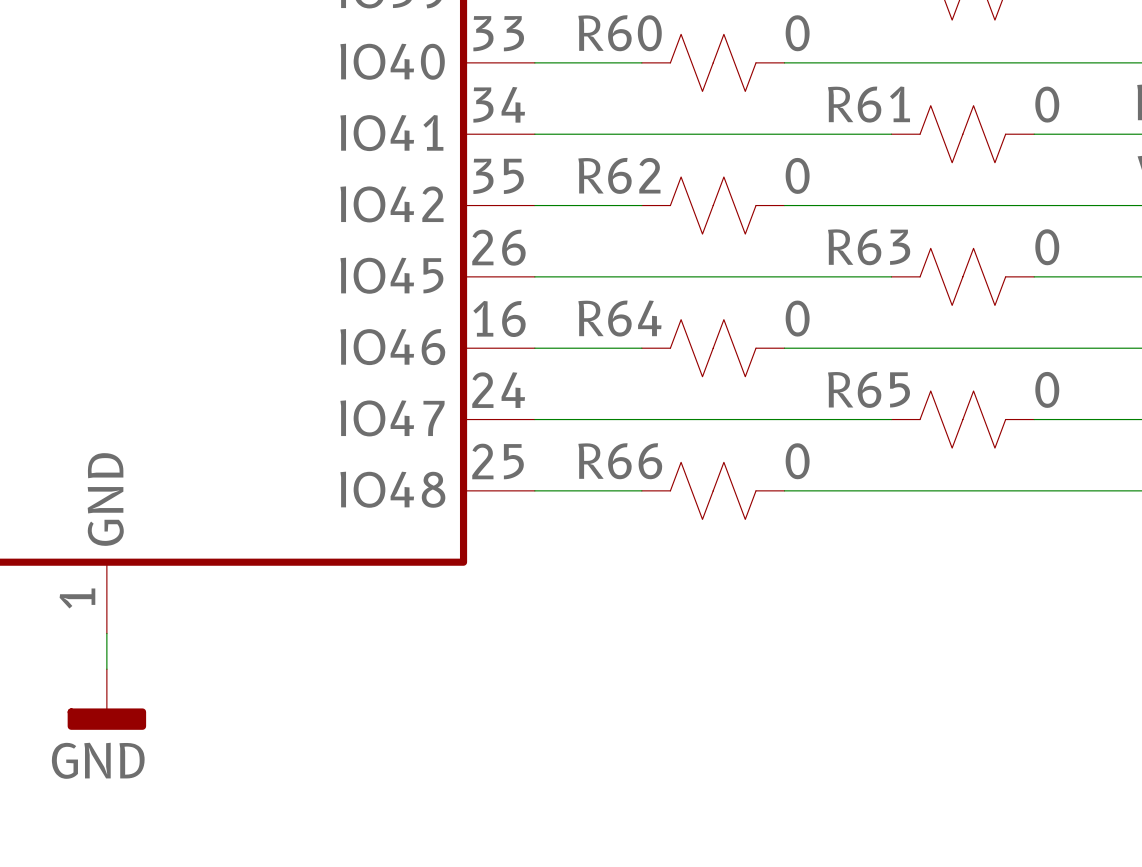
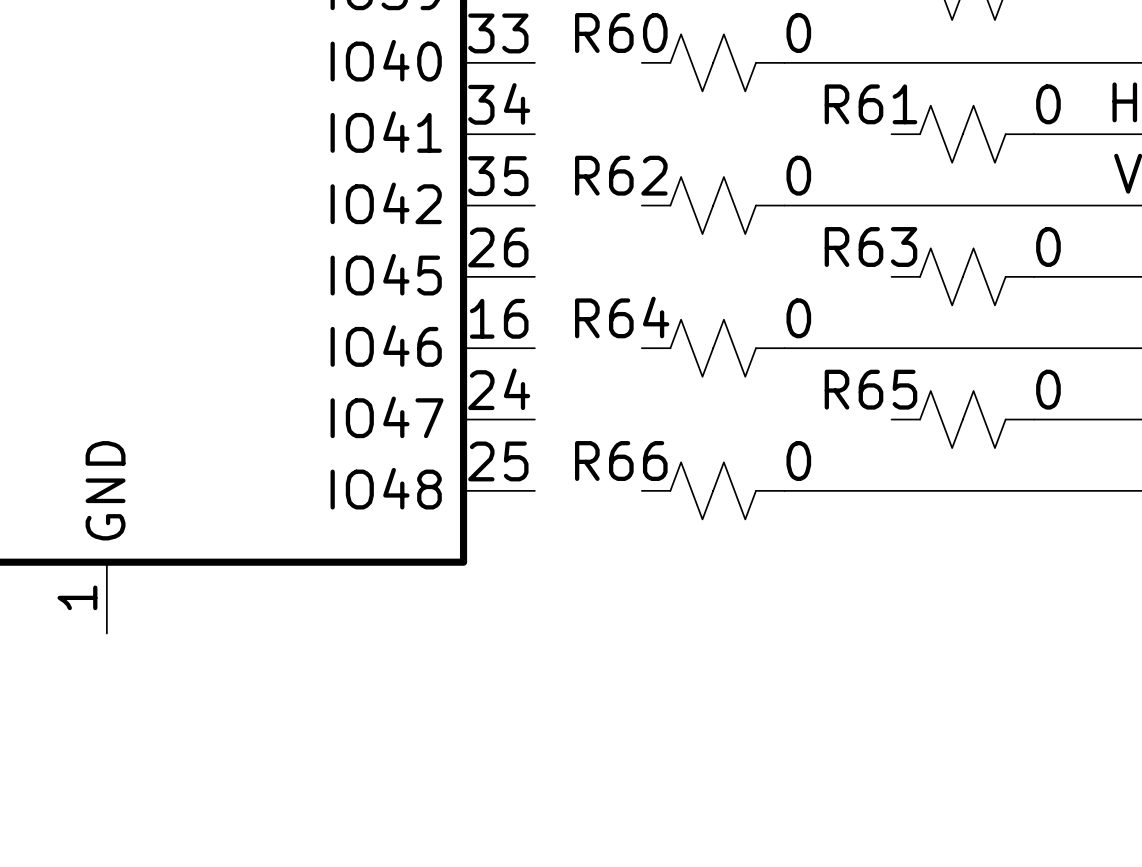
wire: (534, 62) (641, 62) -> none
wire: (534, 134) (891, 134) -> none
wire: (534, 205) (641, 205) -> none
wire: (534, 276) (891, 276) -> none
wire: (534, 348) (641, 348) -> none
wire: (534, 419) (891, 419) -> none
wire: (534, 490) (641, 490) -> none
wire: (106, 633) (106, 669) -> none
power symbol: GND (106, 699) -> none

